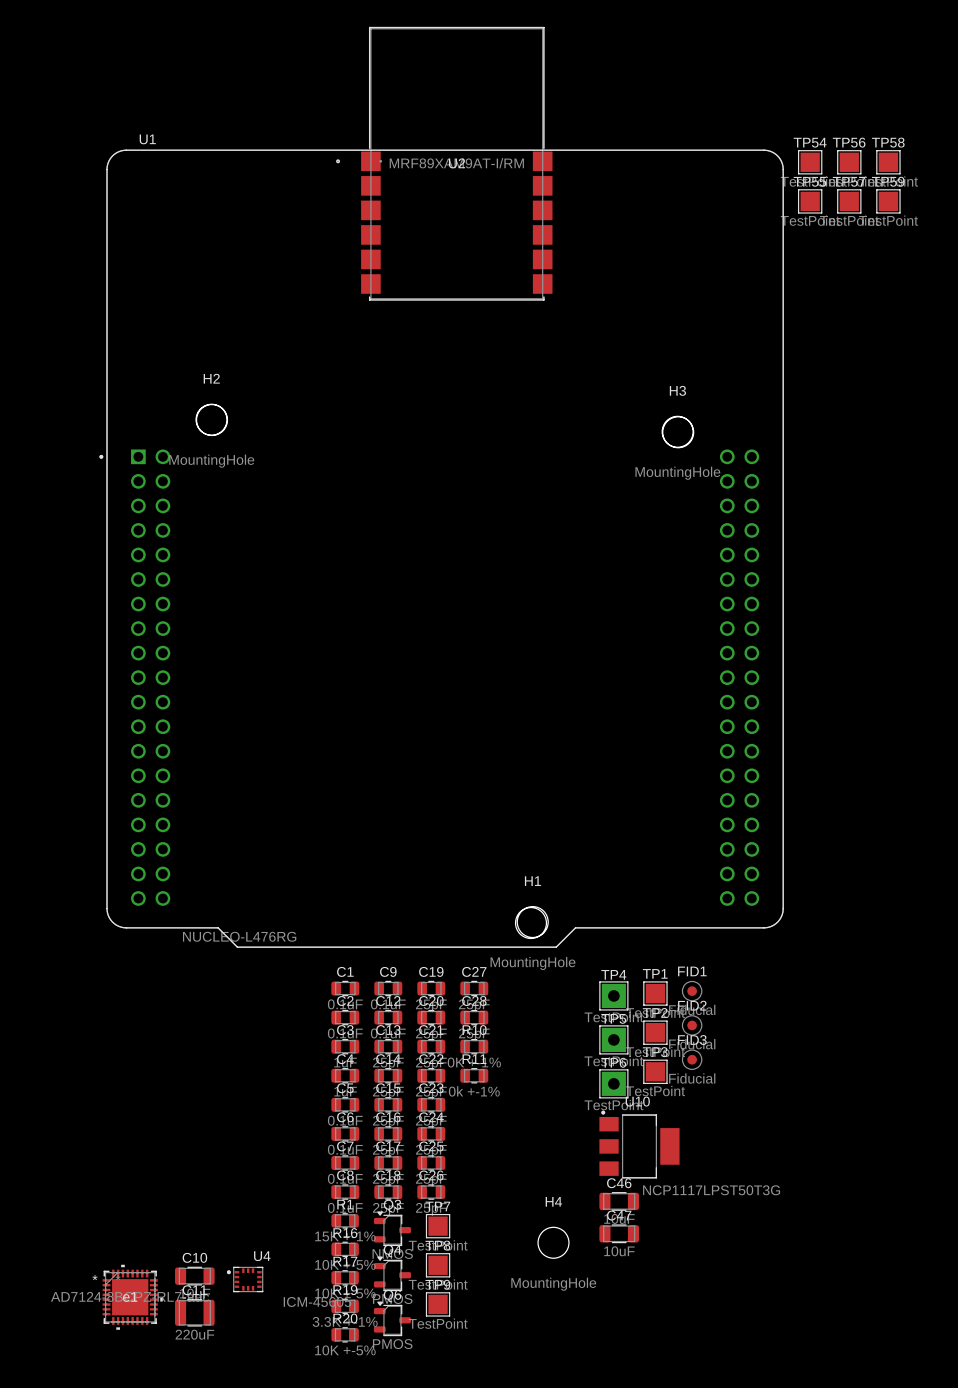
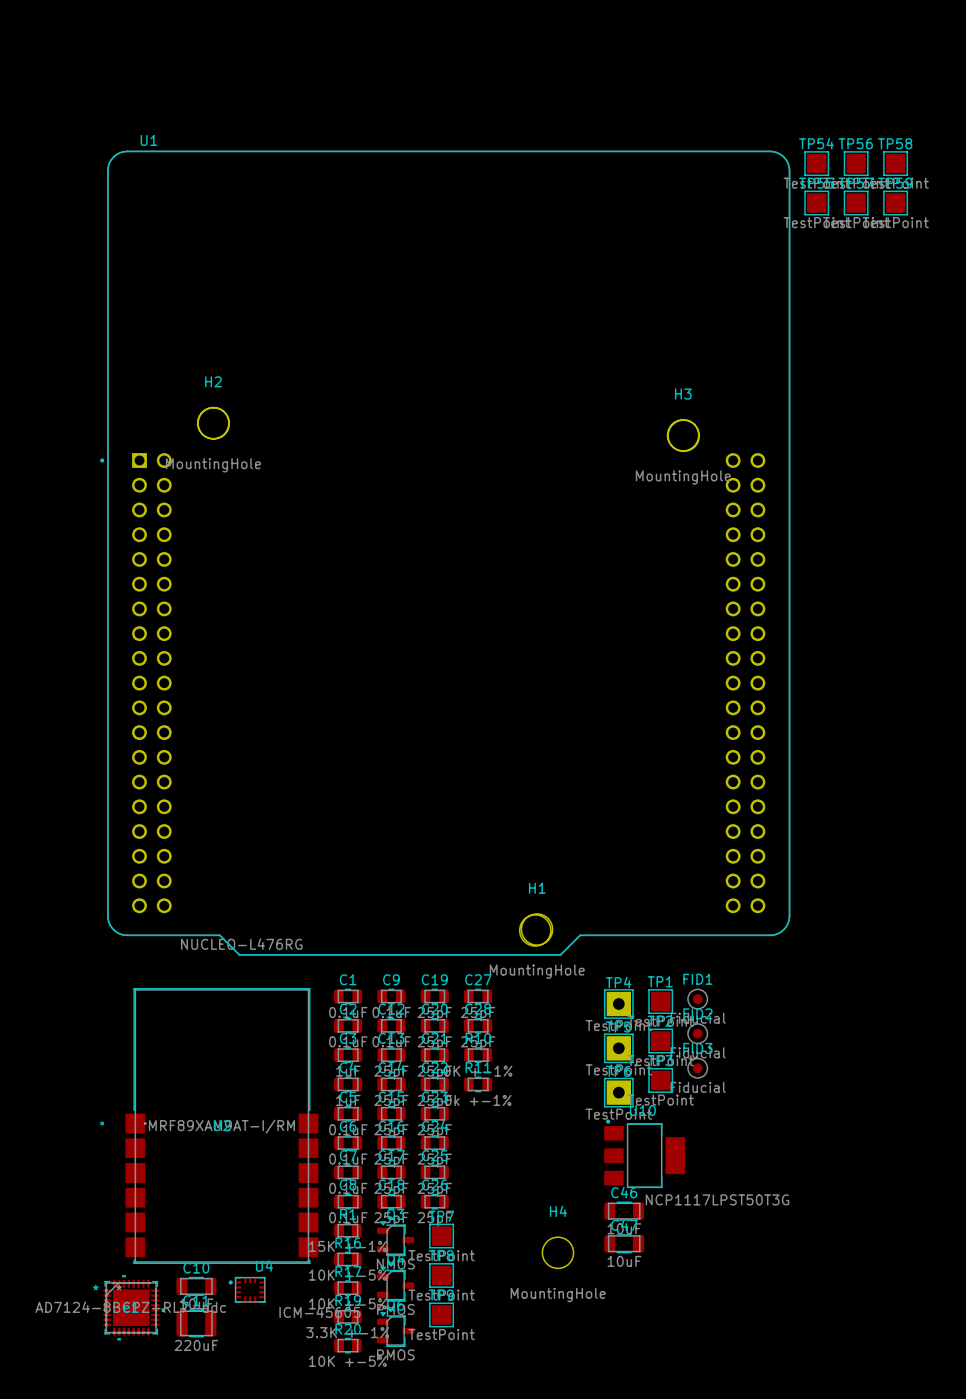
U2 position: (444, 163) -> (209, 1125)

